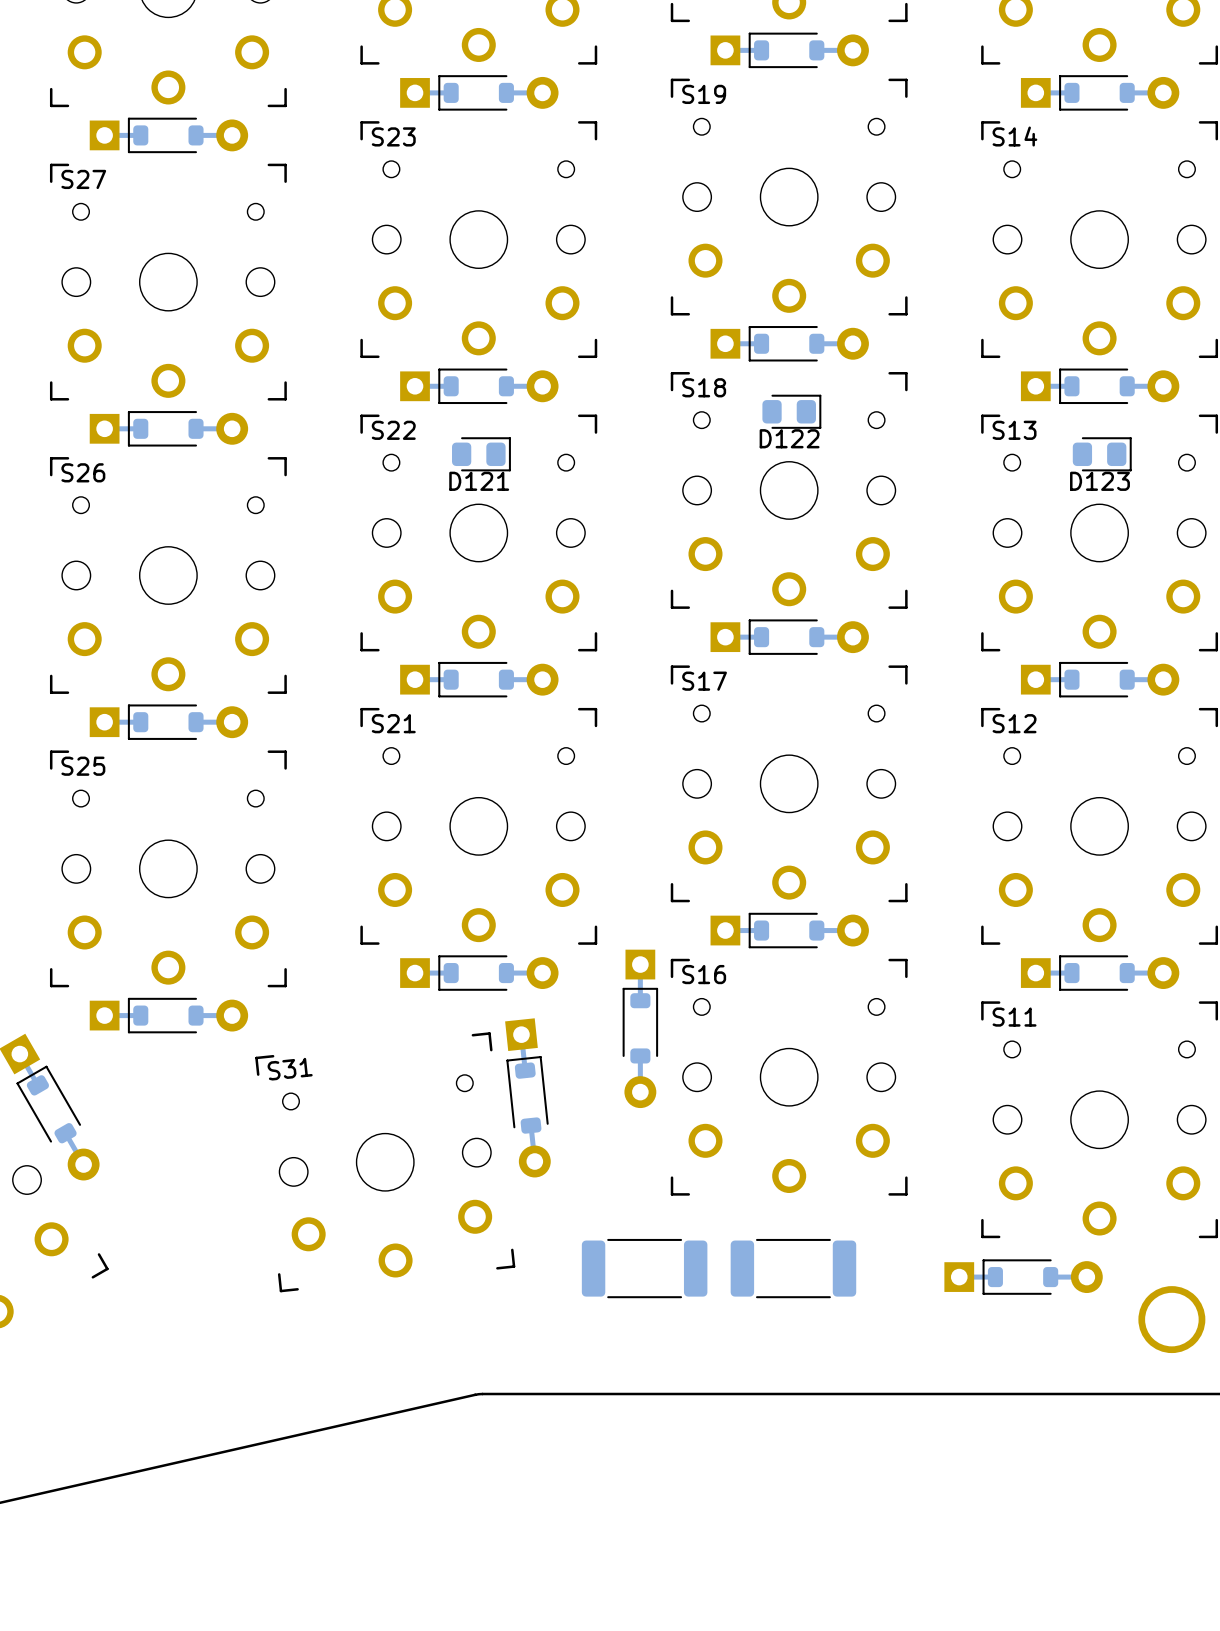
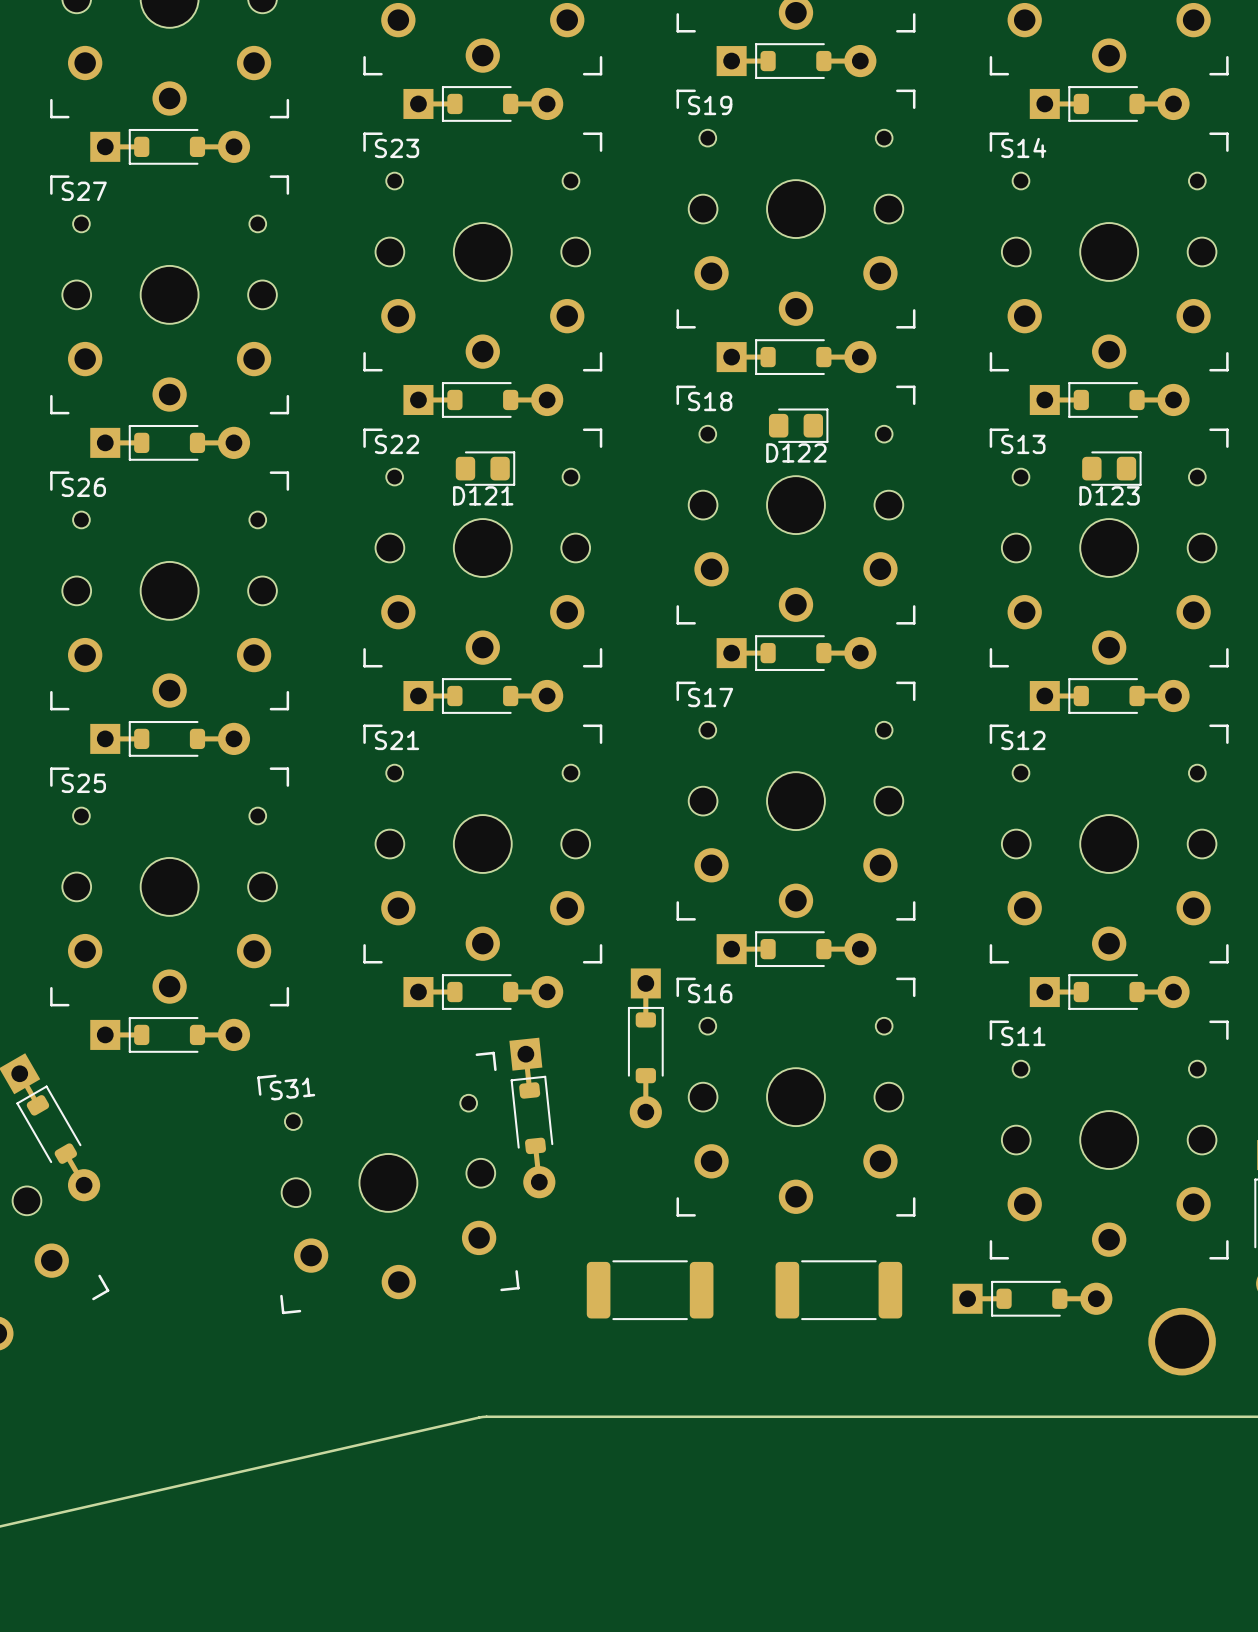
part position: (793, 1268) -> (838, 1290)

